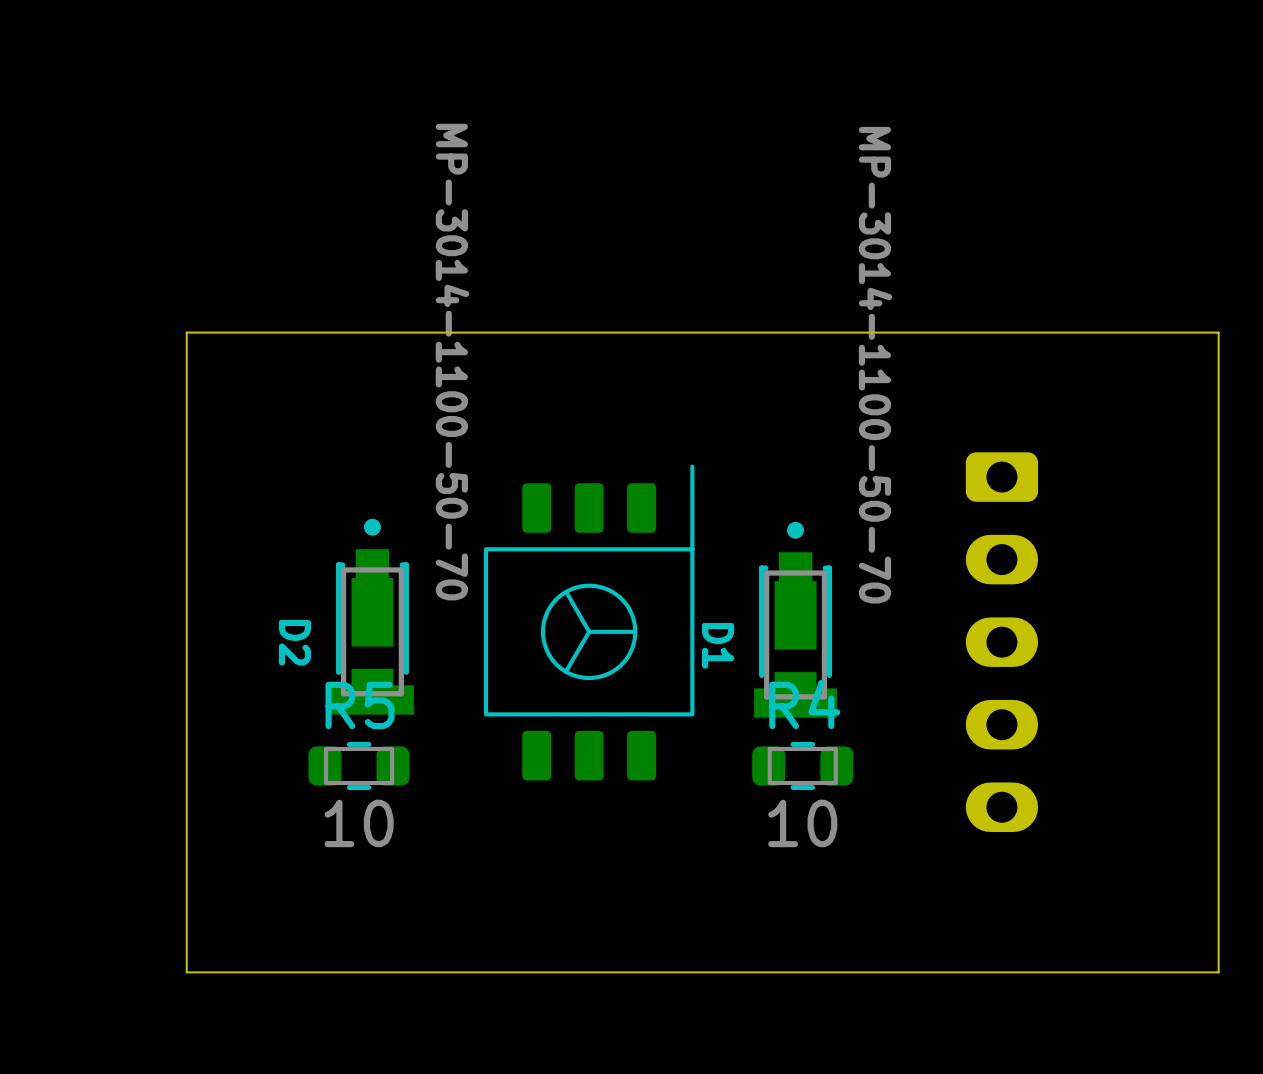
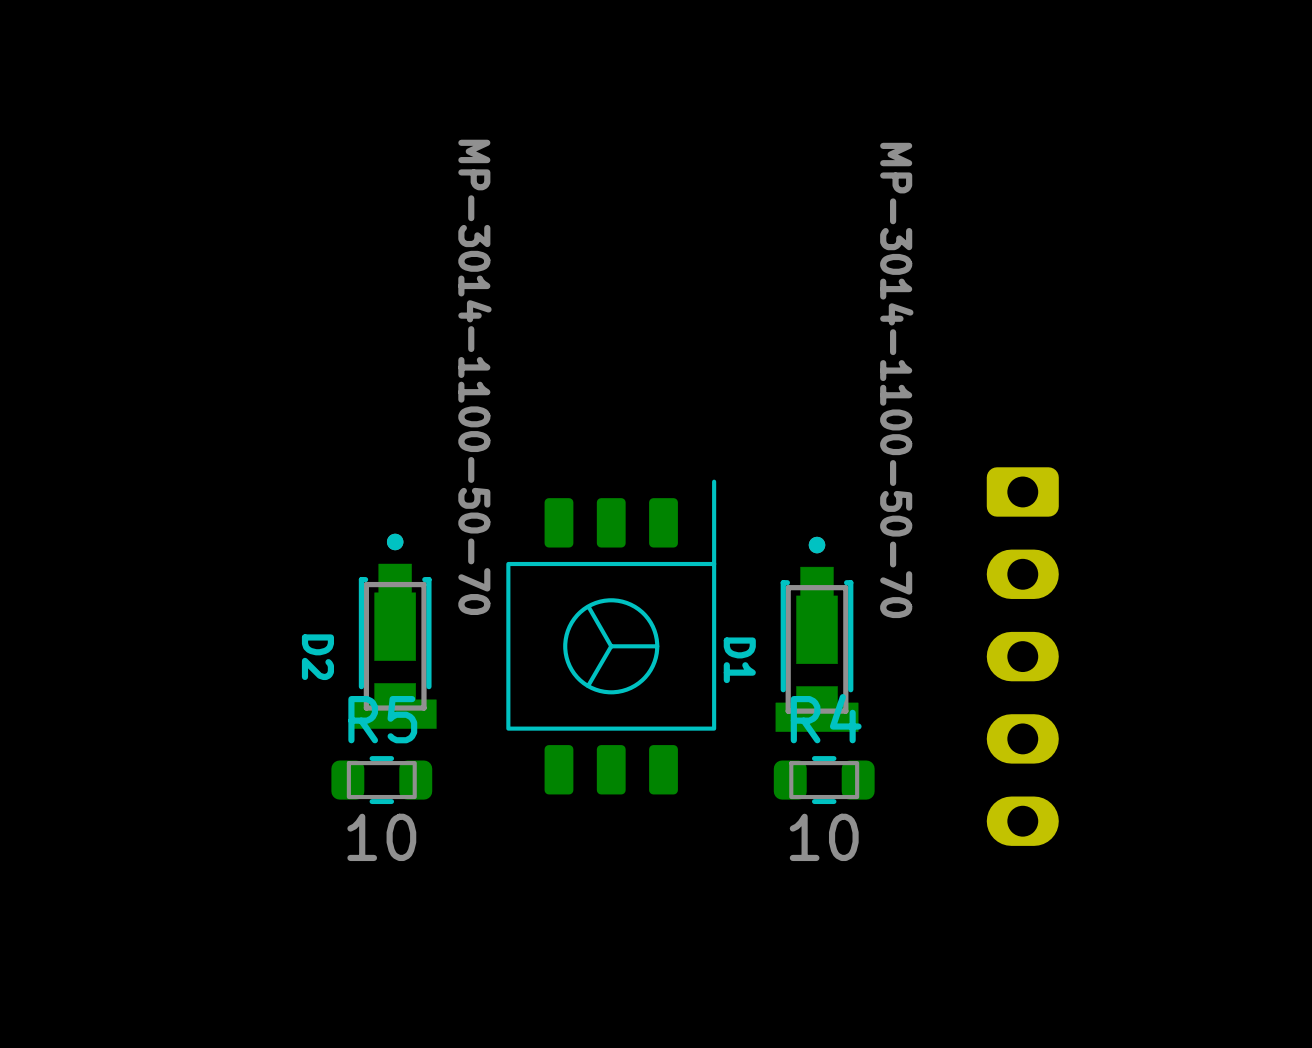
board edge: (1218, 332) (186, 332) (186, 972) (1218, 972) (1218, 332) -> none

